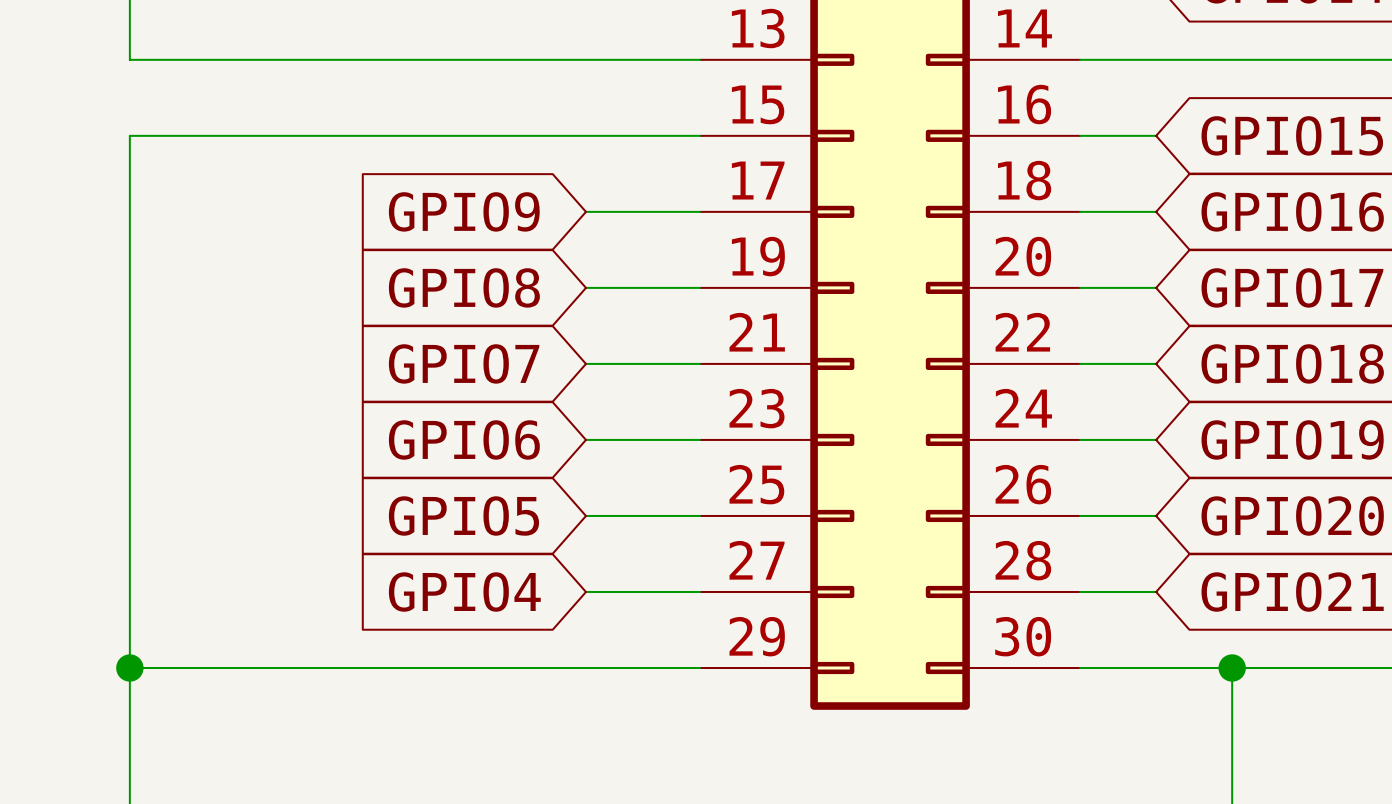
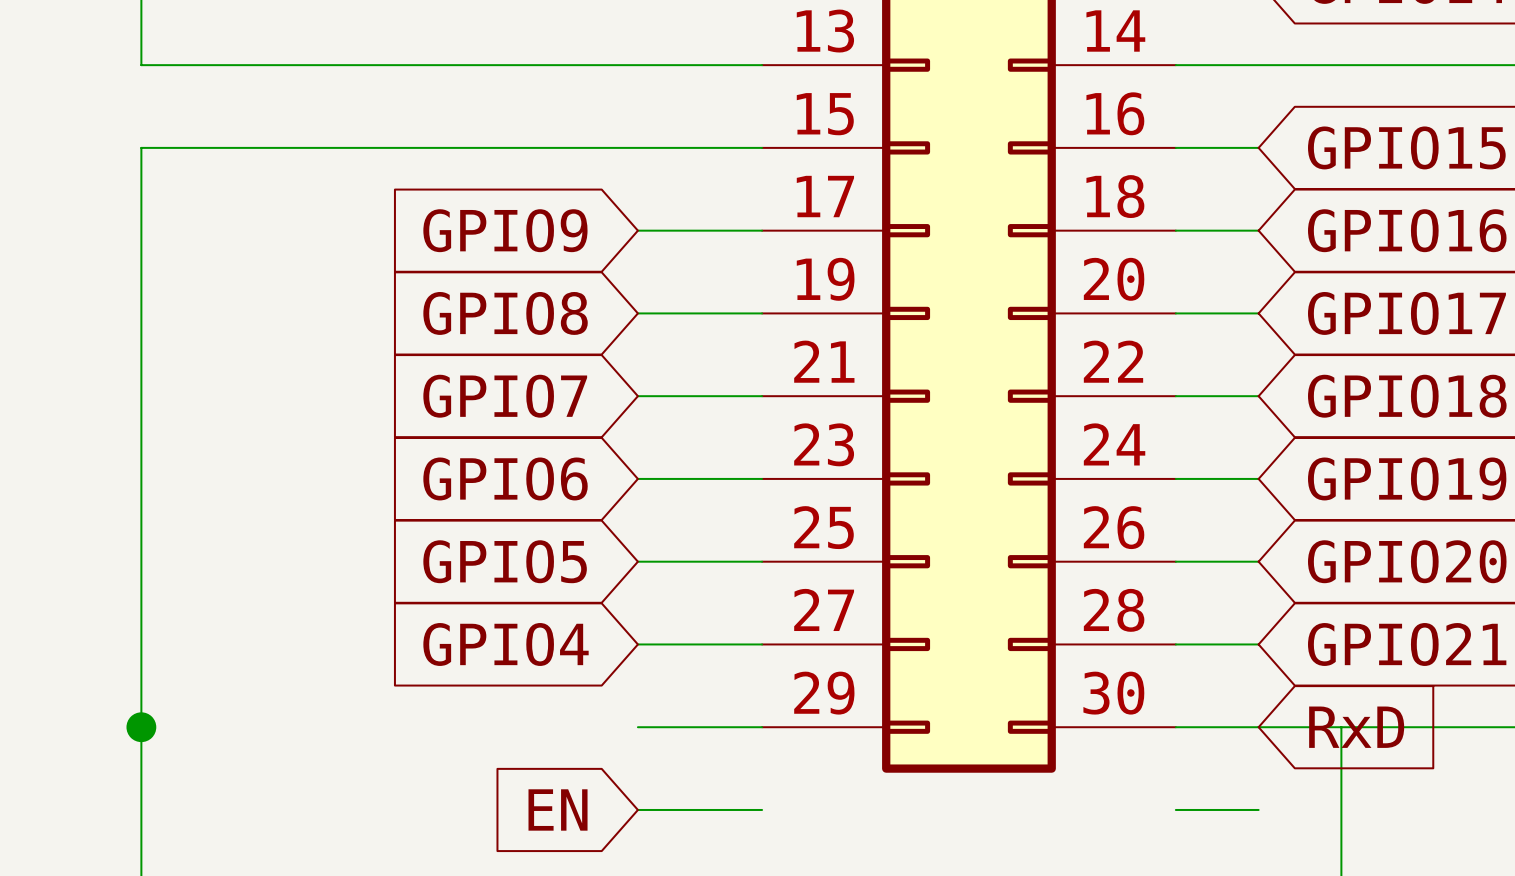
wire: (129, 668) (585, 668) -> none
junction: (1232, 668) -> none
global label: none -> RxD (1356, 727)
global label: none -> EN (558, 809)
wire: none -> (637, 809) (762, 809)
wire: none -> (1175, 809) (1258, 809)

